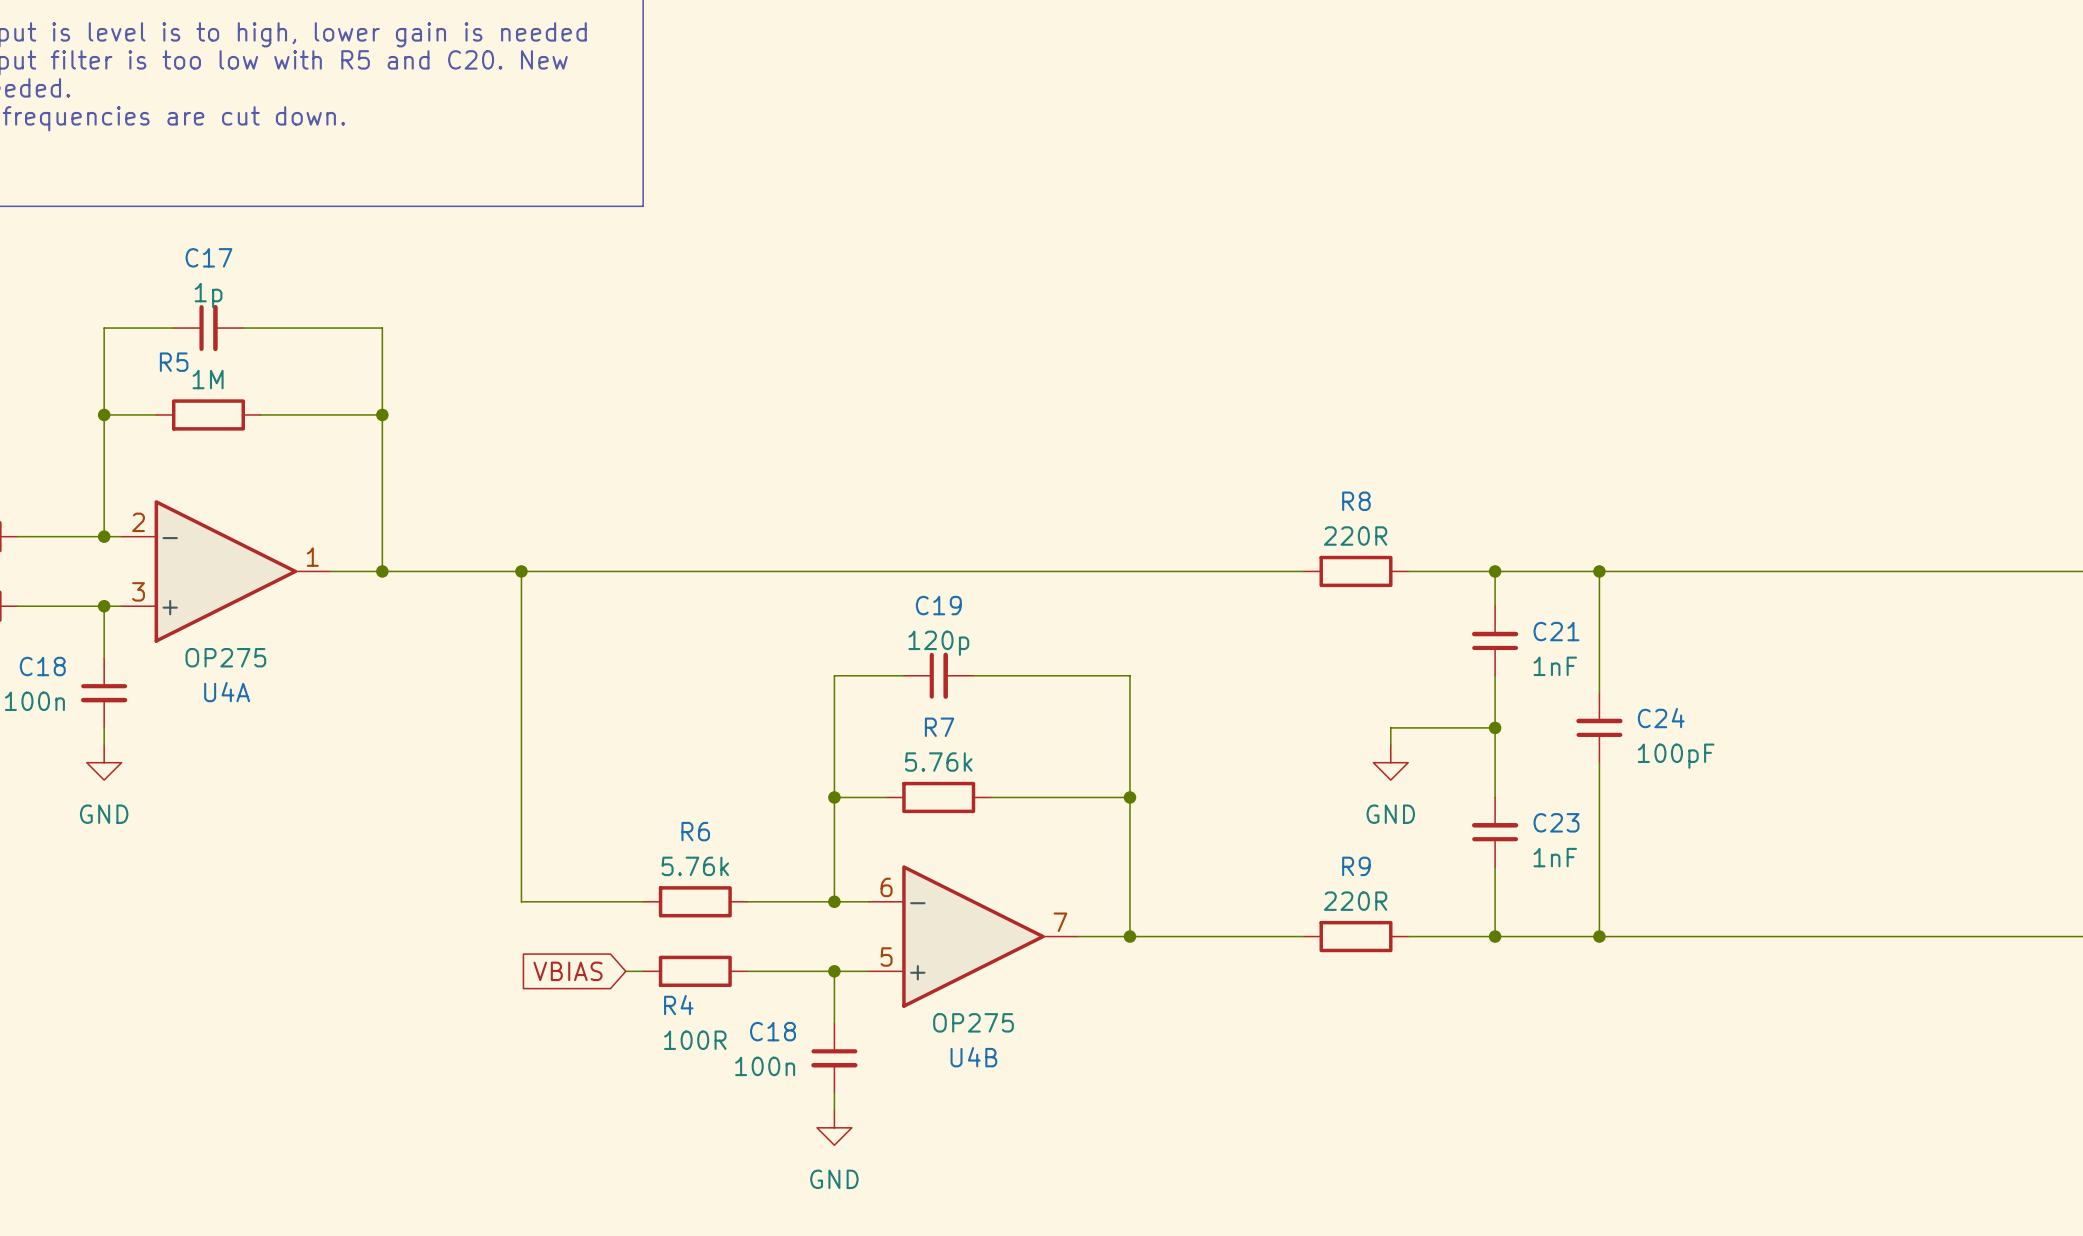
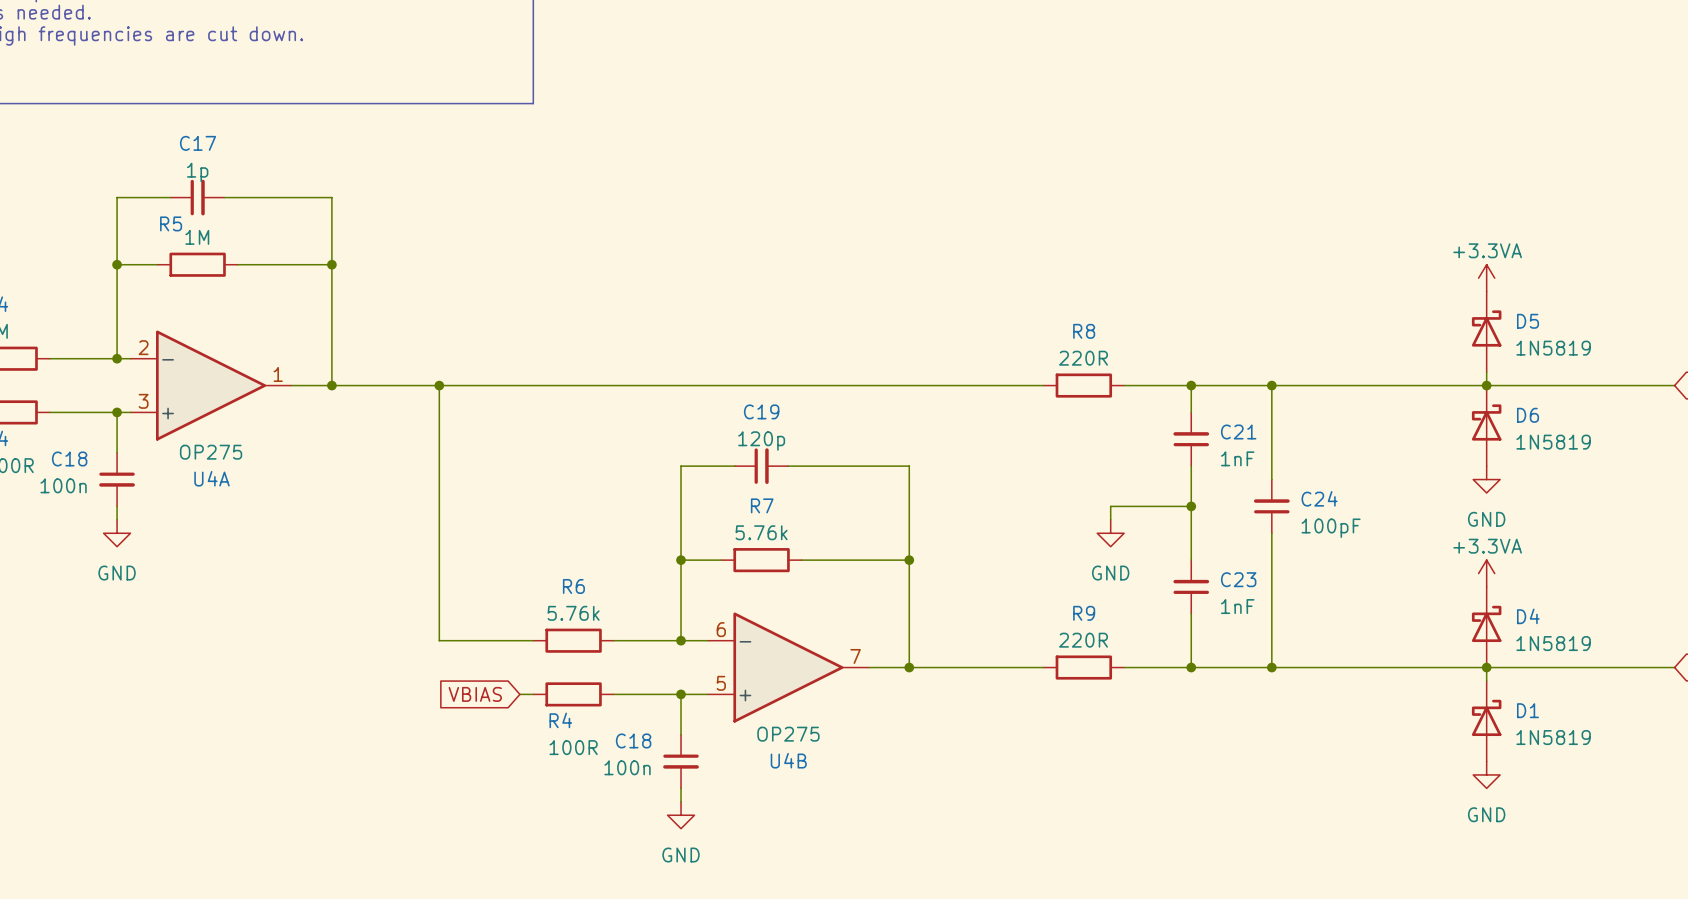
power symbol: none -> +3.3VA (1486, 278)
D5: none -> 1N5819 (1486, 331)
wire: none -> (1486, 372) (1486, 385)
junction: none -> (1486, 385)
D6: none -> 1N5819 (1486, 425)
power symbol: none -> GND (1486, 479)
power symbol: none -> +3.3VA (1486, 573)
D4: none -> 1N5819 (1486, 627)
wire: none -> (1486, 667) (1486, 680)
junction: none -> (1486, 667)
D1: none -> 1N5819 (1486, 721)
power symbol: none -> GND (1486, 774)

